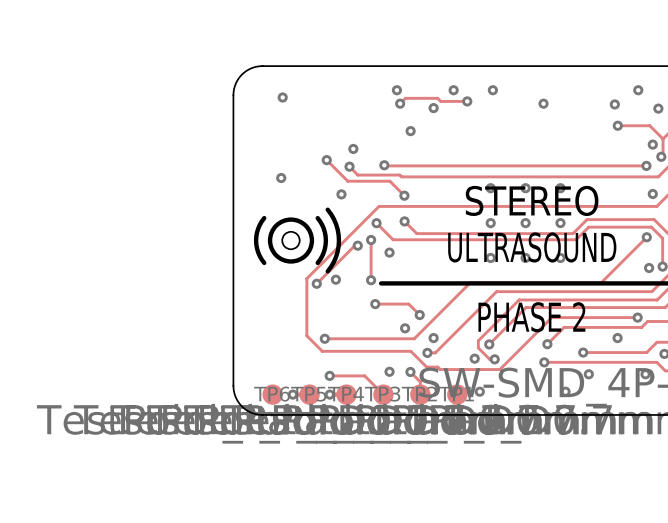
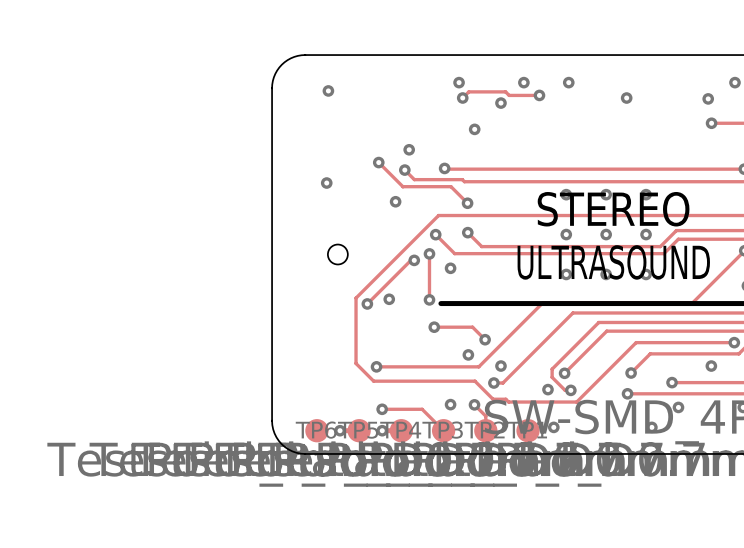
line: (327, 209) (336, 224) (338, 240) (336, 256) (327, 271) -> none
drawing: [267, 217, 315, 264] -> none
line: (264, 218) (258, 228) (256, 240) (258, 252) (264, 262) -> none
line: (317, 218) (323, 228) (325, 240) (323, 252) (317, 262) -> none
text: PHASE 2 (531, 317) -> none

